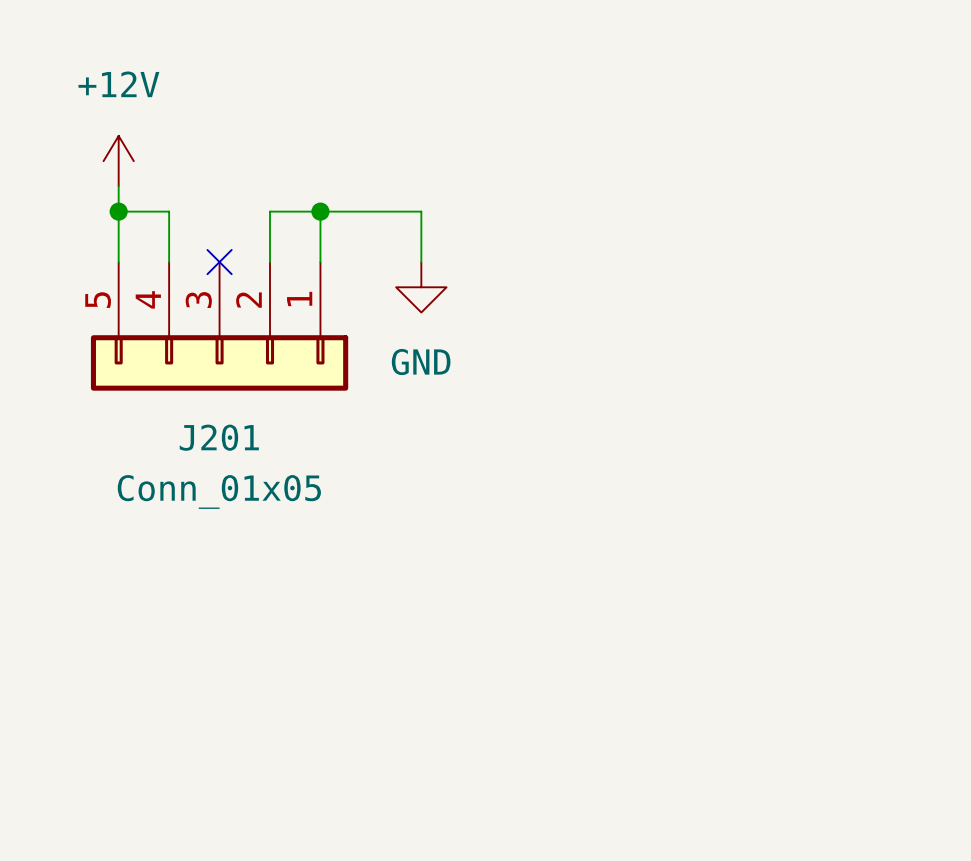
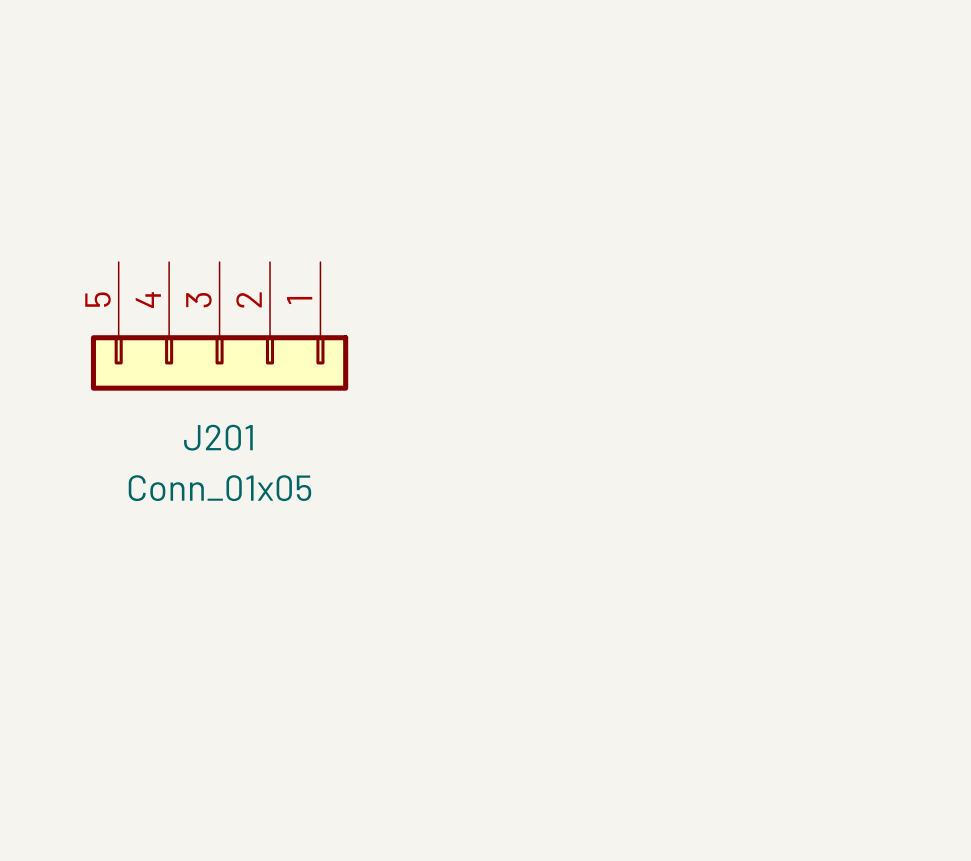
power symbol: +12V (118, 161) -> none
wire: (118, 186) (118, 262) -> none
wire: (118, 211) (169, 211) (169, 262) -> none
junction: (118, 211) -> none
wire: (320, 211) (320, 262) -> none
junction: (320, 211) -> none
no-connect mark: (219, 262) -> none
wire: (270, 262) (270, 211) (421, 211) (421, 262) -> none
power symbol: GND (421, 287) -> none

